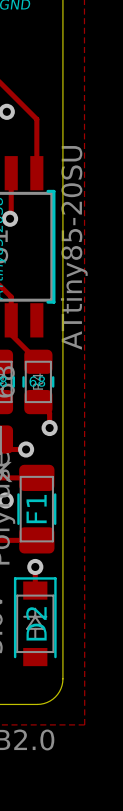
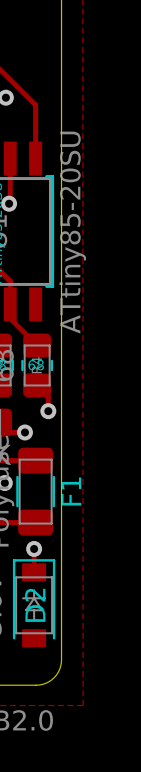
F1 name position: F1 (36, 509) -> F1 (71, 491)

